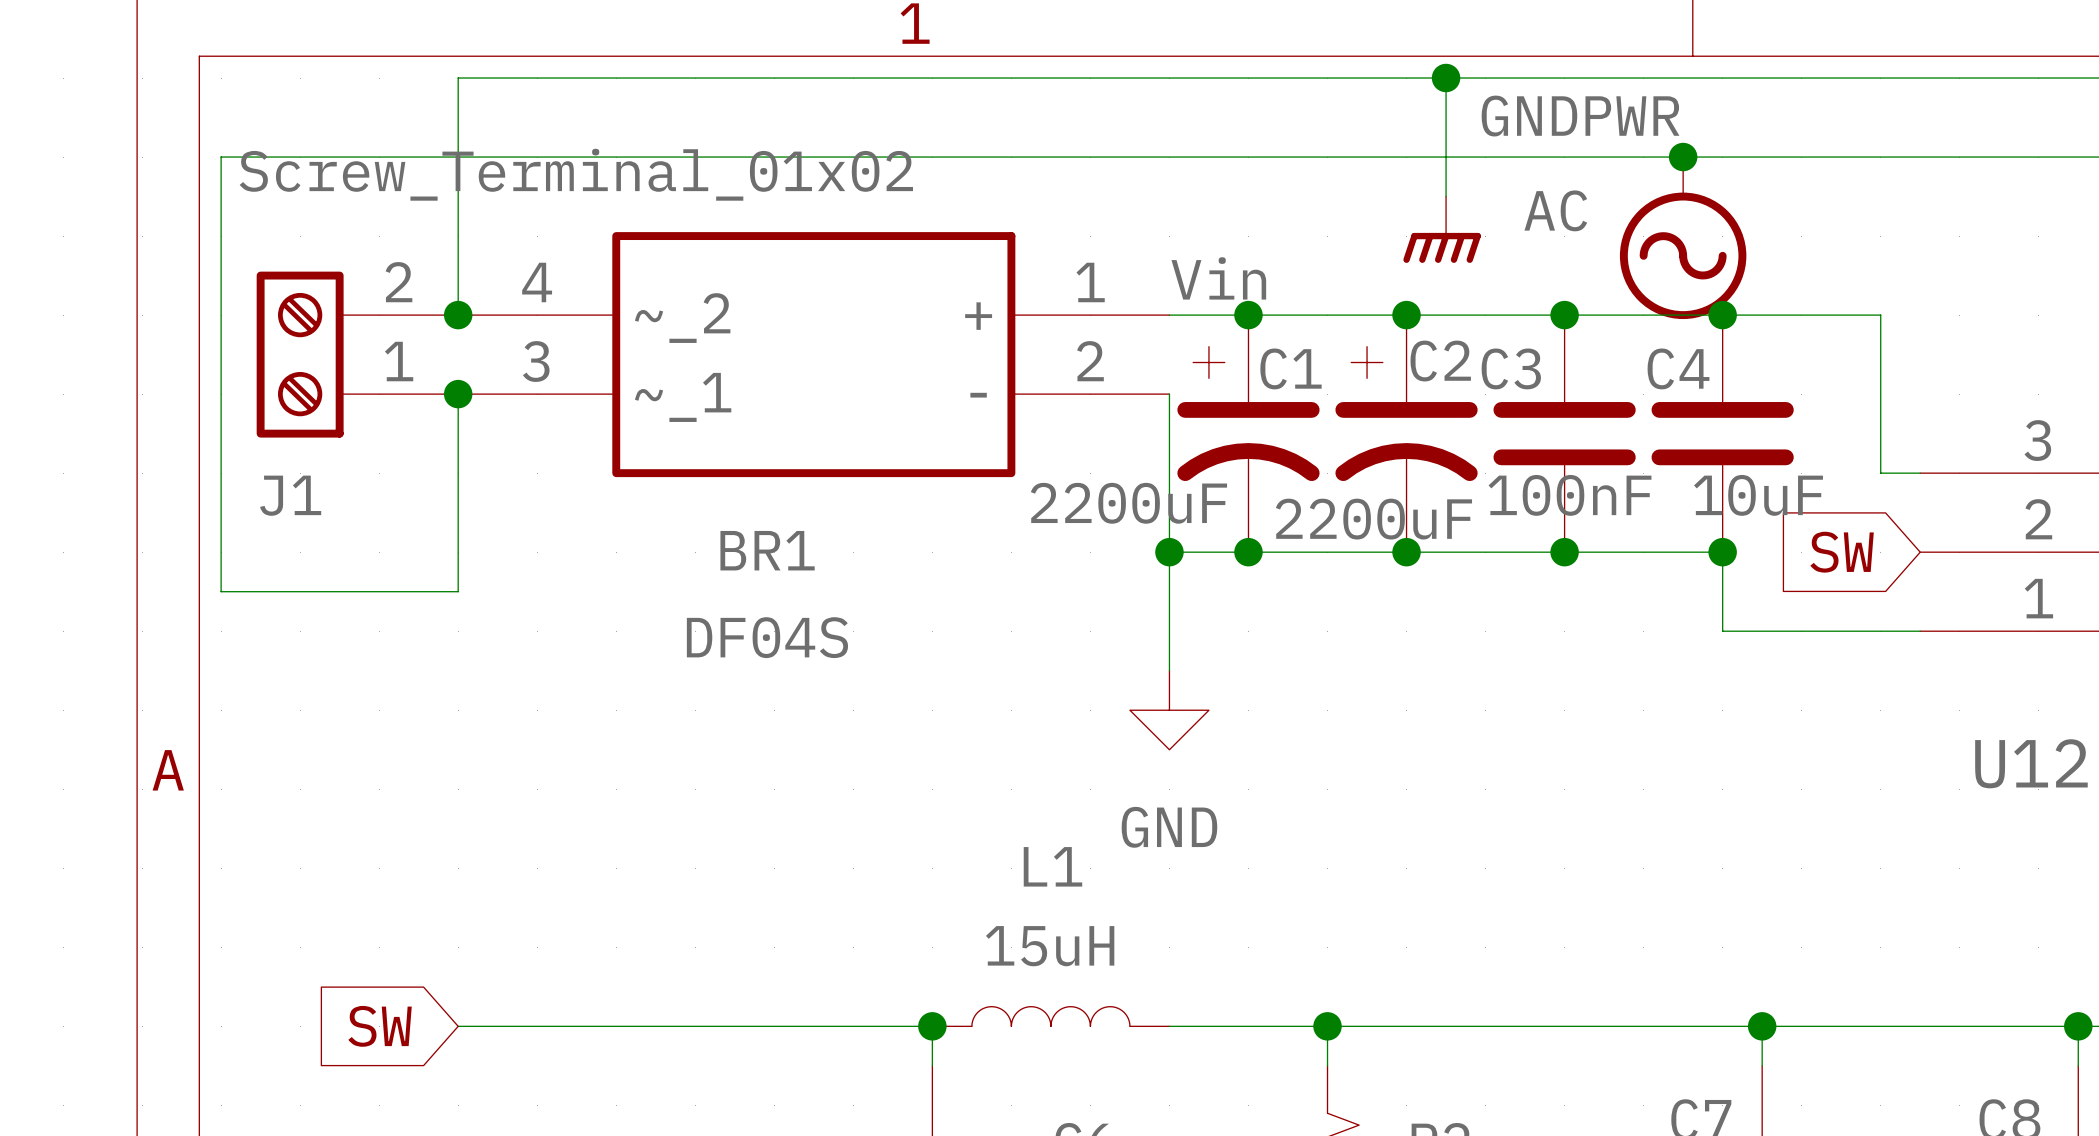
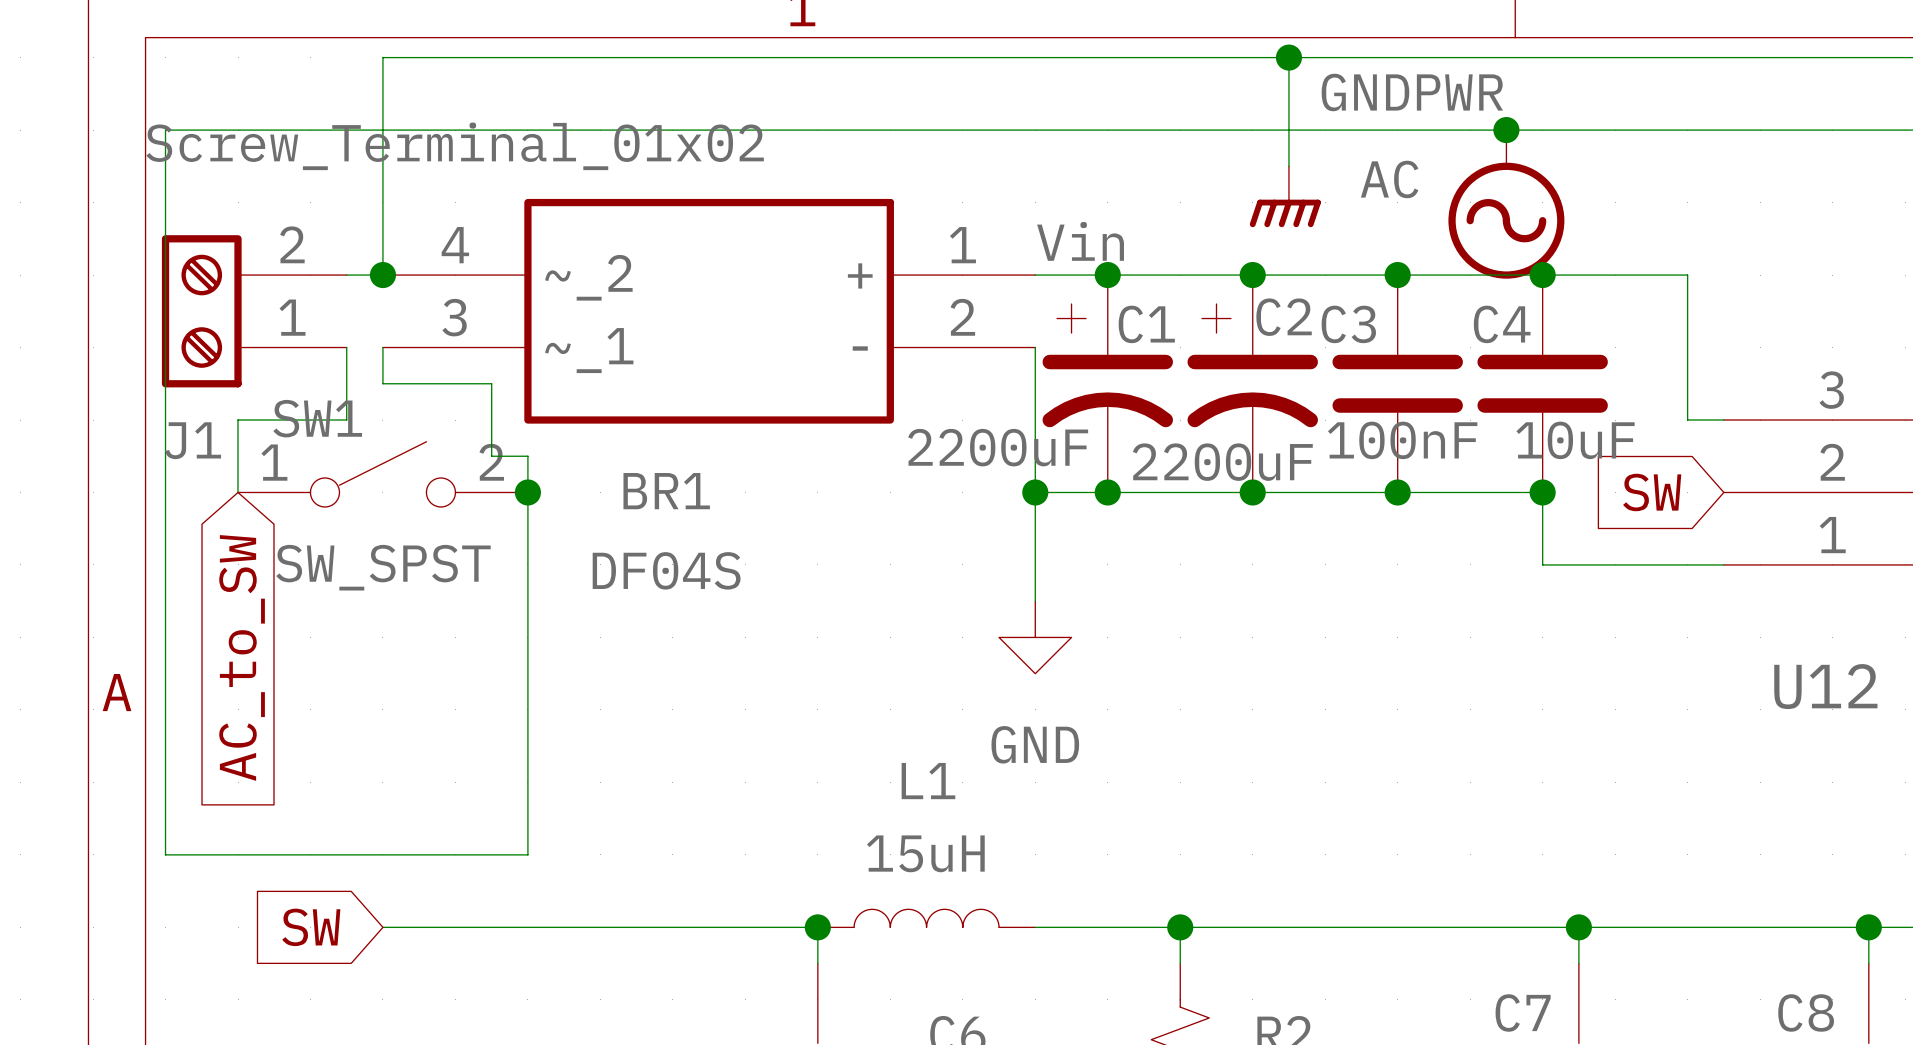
J1 position: (357, 354) -> (254, 311)
wire: none -> (346, 347) (346, 420) (238, 420) (238, 492)
junction: (458, 394) -> none
wire: (458, 433) (458, 591) (221, 591) -> (382, 383) (491, 383) (491, 456) (527, 456) (527, 854) (165, 854) (165, 528)
SW1: none -> SW_SPST (382, 474)
junction: none -> (527, 492)
global label: none -> AC_to_SW (242, 657)

